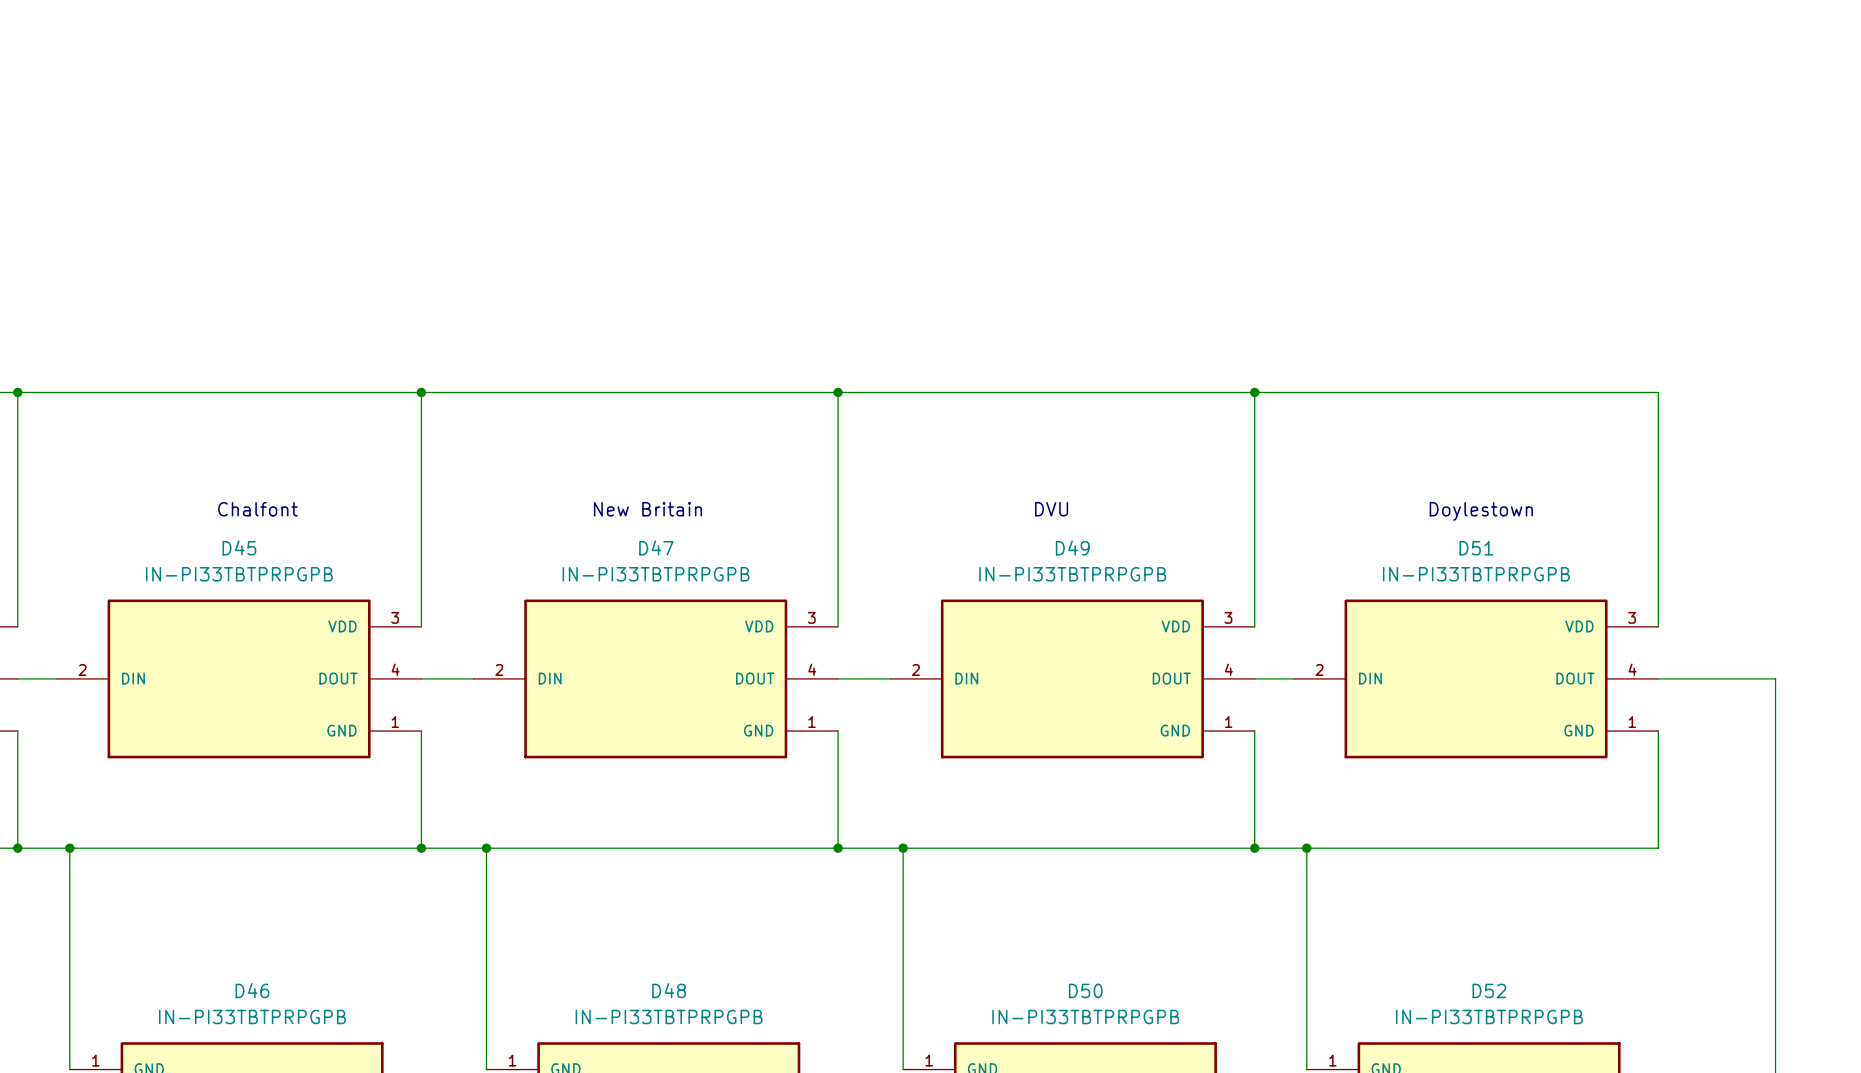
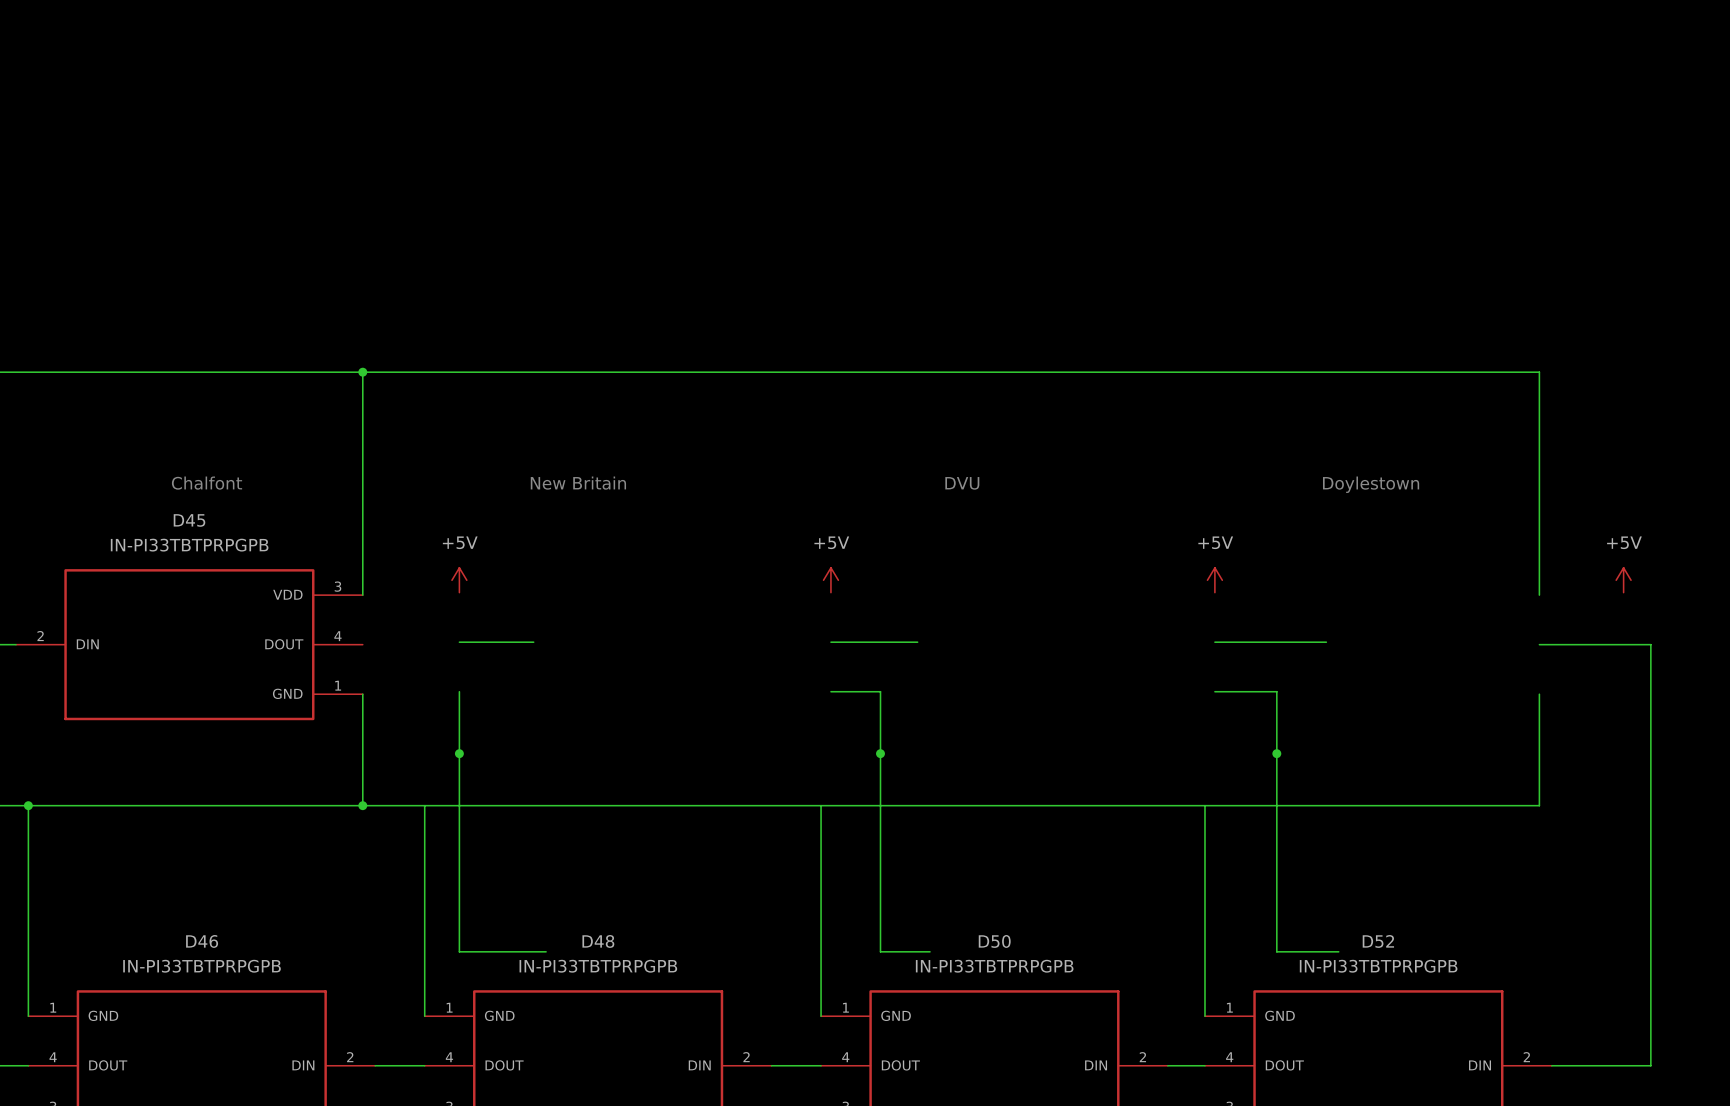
wire: (838, 392) (838, 626) -> none
junction: (838, 392) -> none
wire: (1254, 392) (1254, 626) -> none
junction: (1254, 392) -> none
power symbol: none -> +5V (459, 580)
power symbol: none -> +5V (830, 580)
power symbol: none -> +5V (1214, 580)
power symbol: none -> +5V (1623, 580)
wire: (421, 678) (473, 678) -> none
D47: IN-PI33TBTPRPGPB (655, 678) -> none
wire: (838, 678) (890, 678) -> none
D49: IN-PI33TBTPRPGPB (1072, 678) -> none
wire: (1254, 678) (1293, 678) -> none
D51: IN-PI33TBTPRPGPB (1476, 678) -> none
wire: none -> (459, 691) (459, 951) (546, 951)
wire: none -> (830, 691) (880, 691) (880, 951) (930, 951)
wire: none -> (1214, 691) (1276, 691) (1276, 951) (1338, 951)
wire: (838, 731) (838, 848) -> none
wire: (1254, 731) (1254, 848) -> none
junction: none -> (459, 753)
junction: none -> (880, 753)
junction: none -> (1276, 753)
junction: (486, 848) -> none
junction: (838, 848) -> none
junction: (903, 848) -> none
junction: (1254, 848) -> none
junction: (1306, 848) -> none

